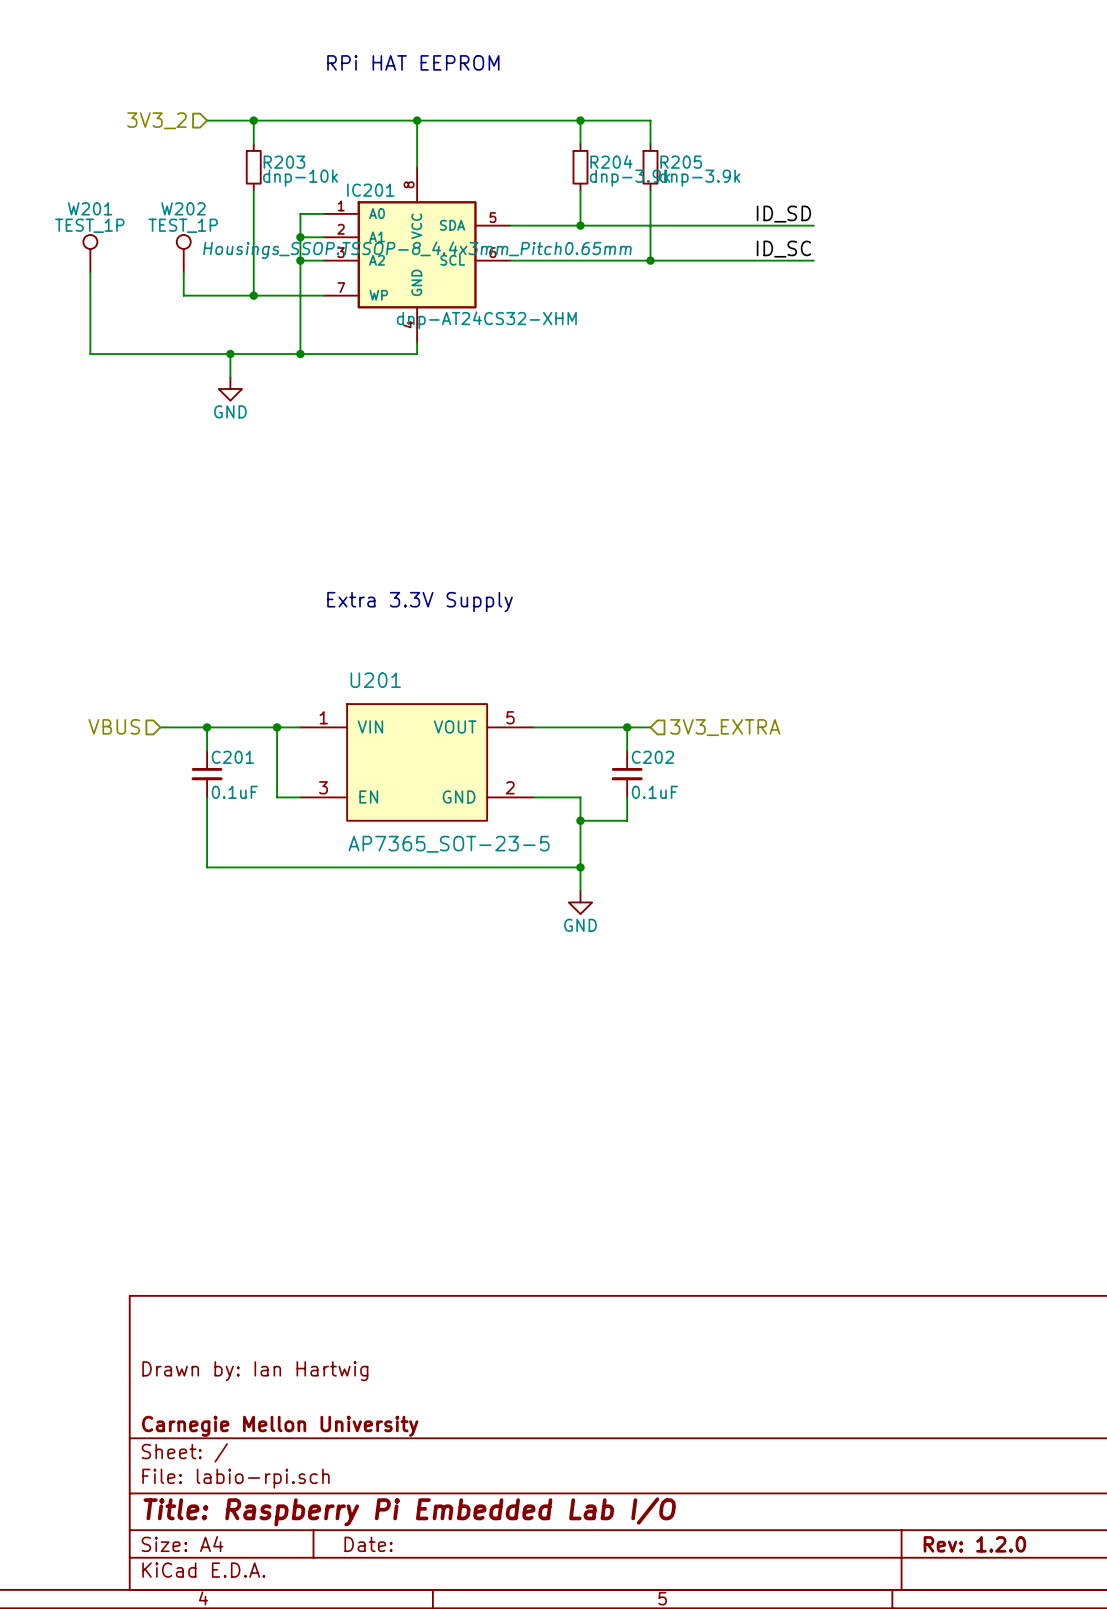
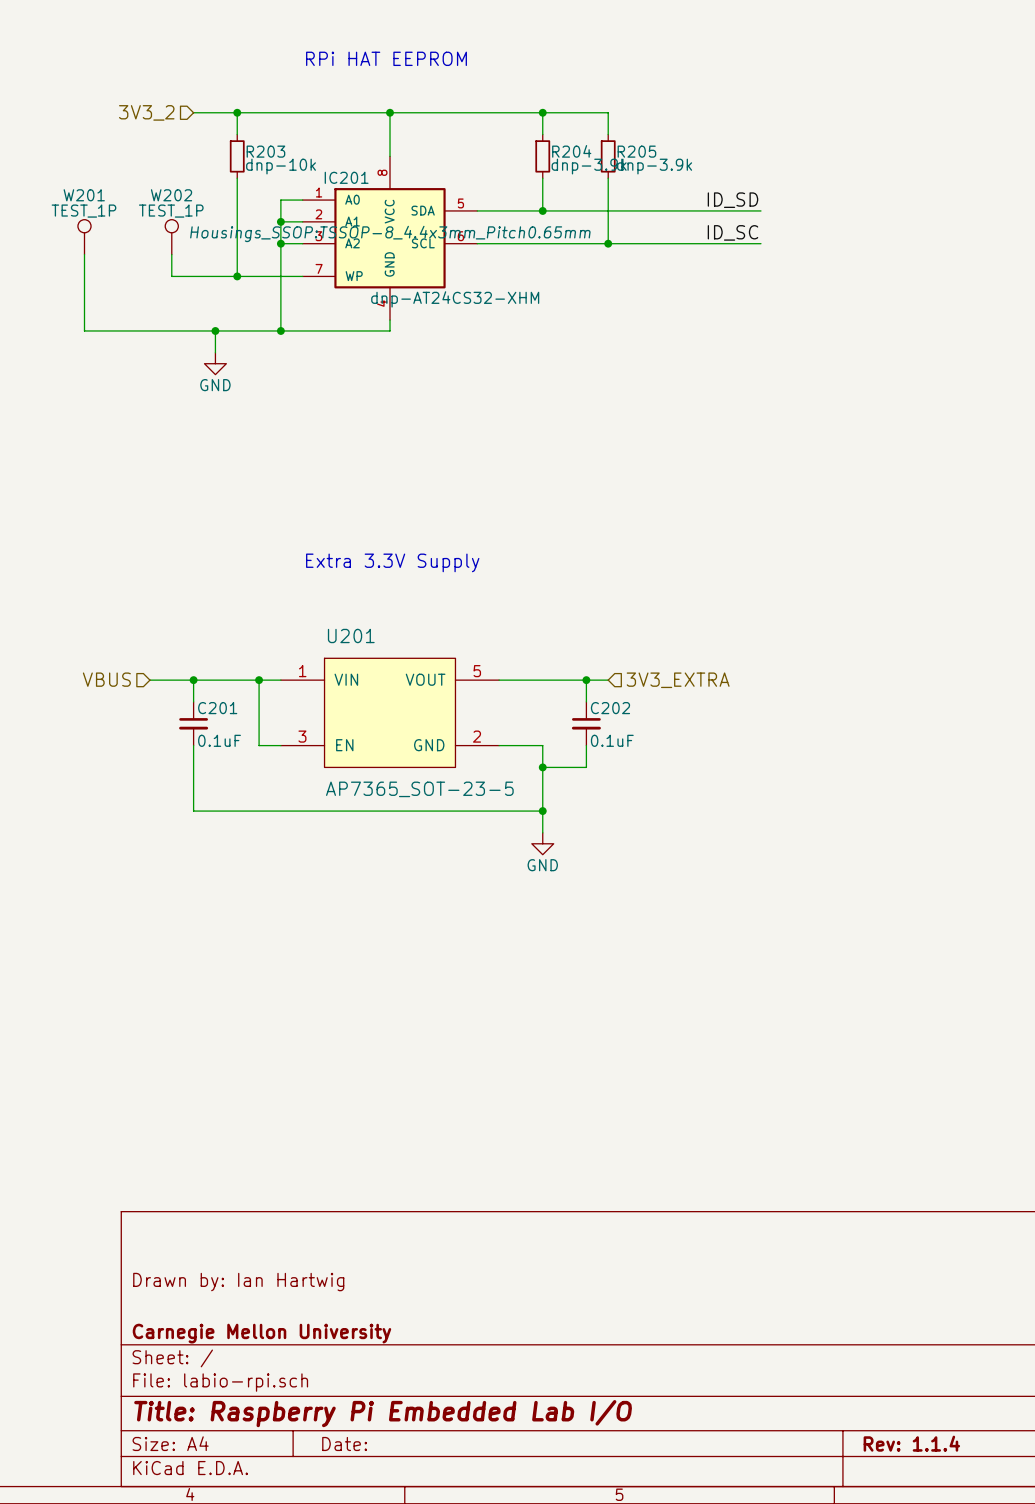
title block: Rev: 1.2.0 (974, 1544) -> Rev: 1.1.4 (911, 1443)

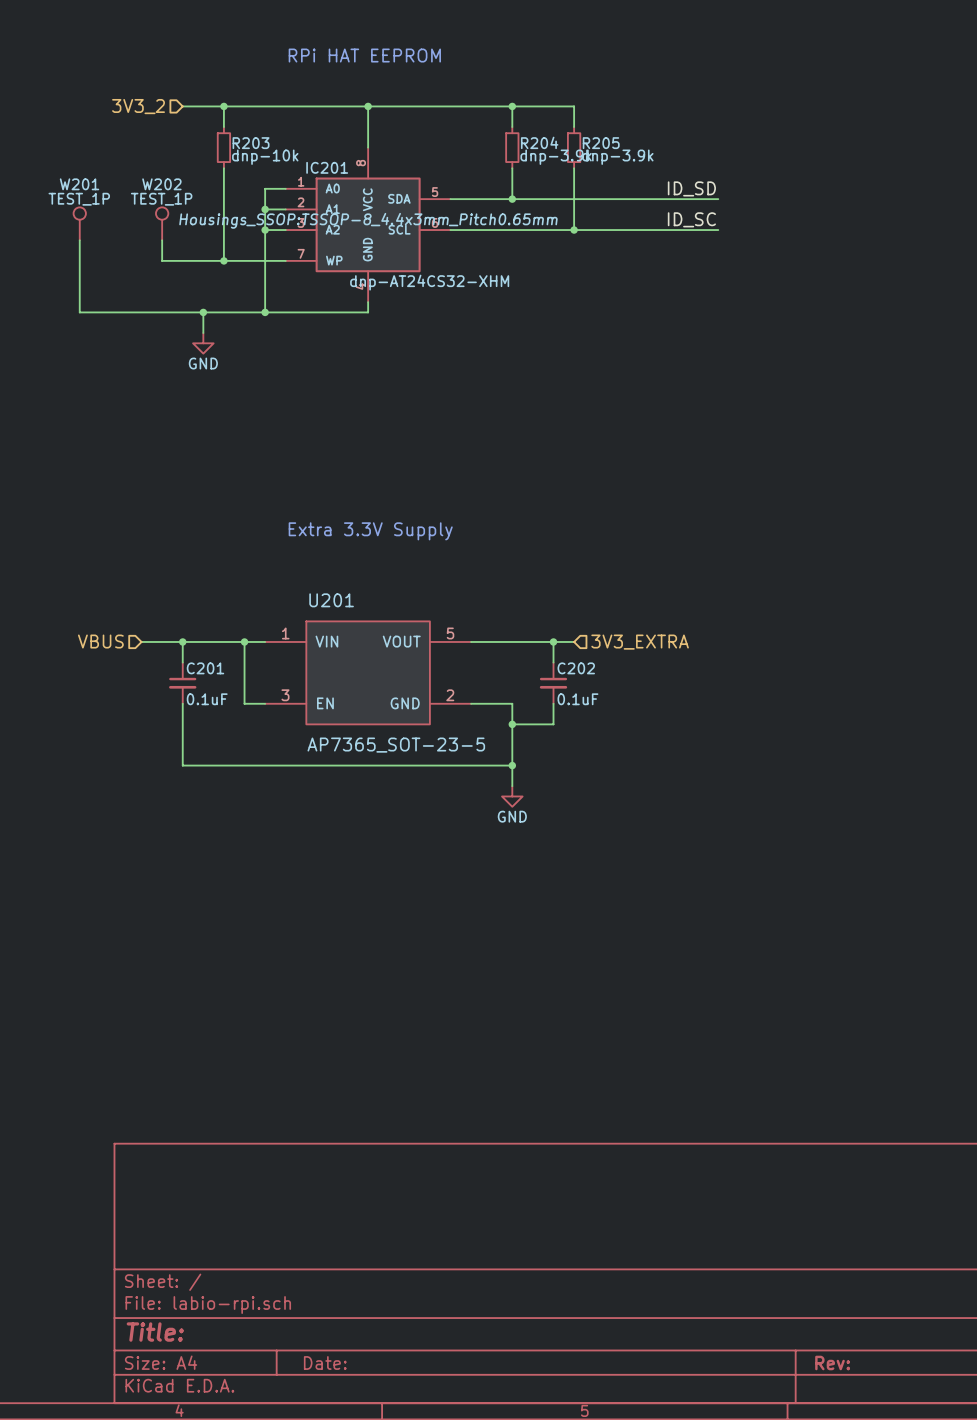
title block: Drawn by: Ian Hartwig (238, 1282) -> none
title block: Carnegie Mellon University (261, 1333) -> none
title block: Title: Raspberry Pi Embedded Lab I/O (383, 1413) -> Title: (155, 1332)
title block: Rev: 1.1.4 (911, 1443) -> Rev: (832, 1363)

